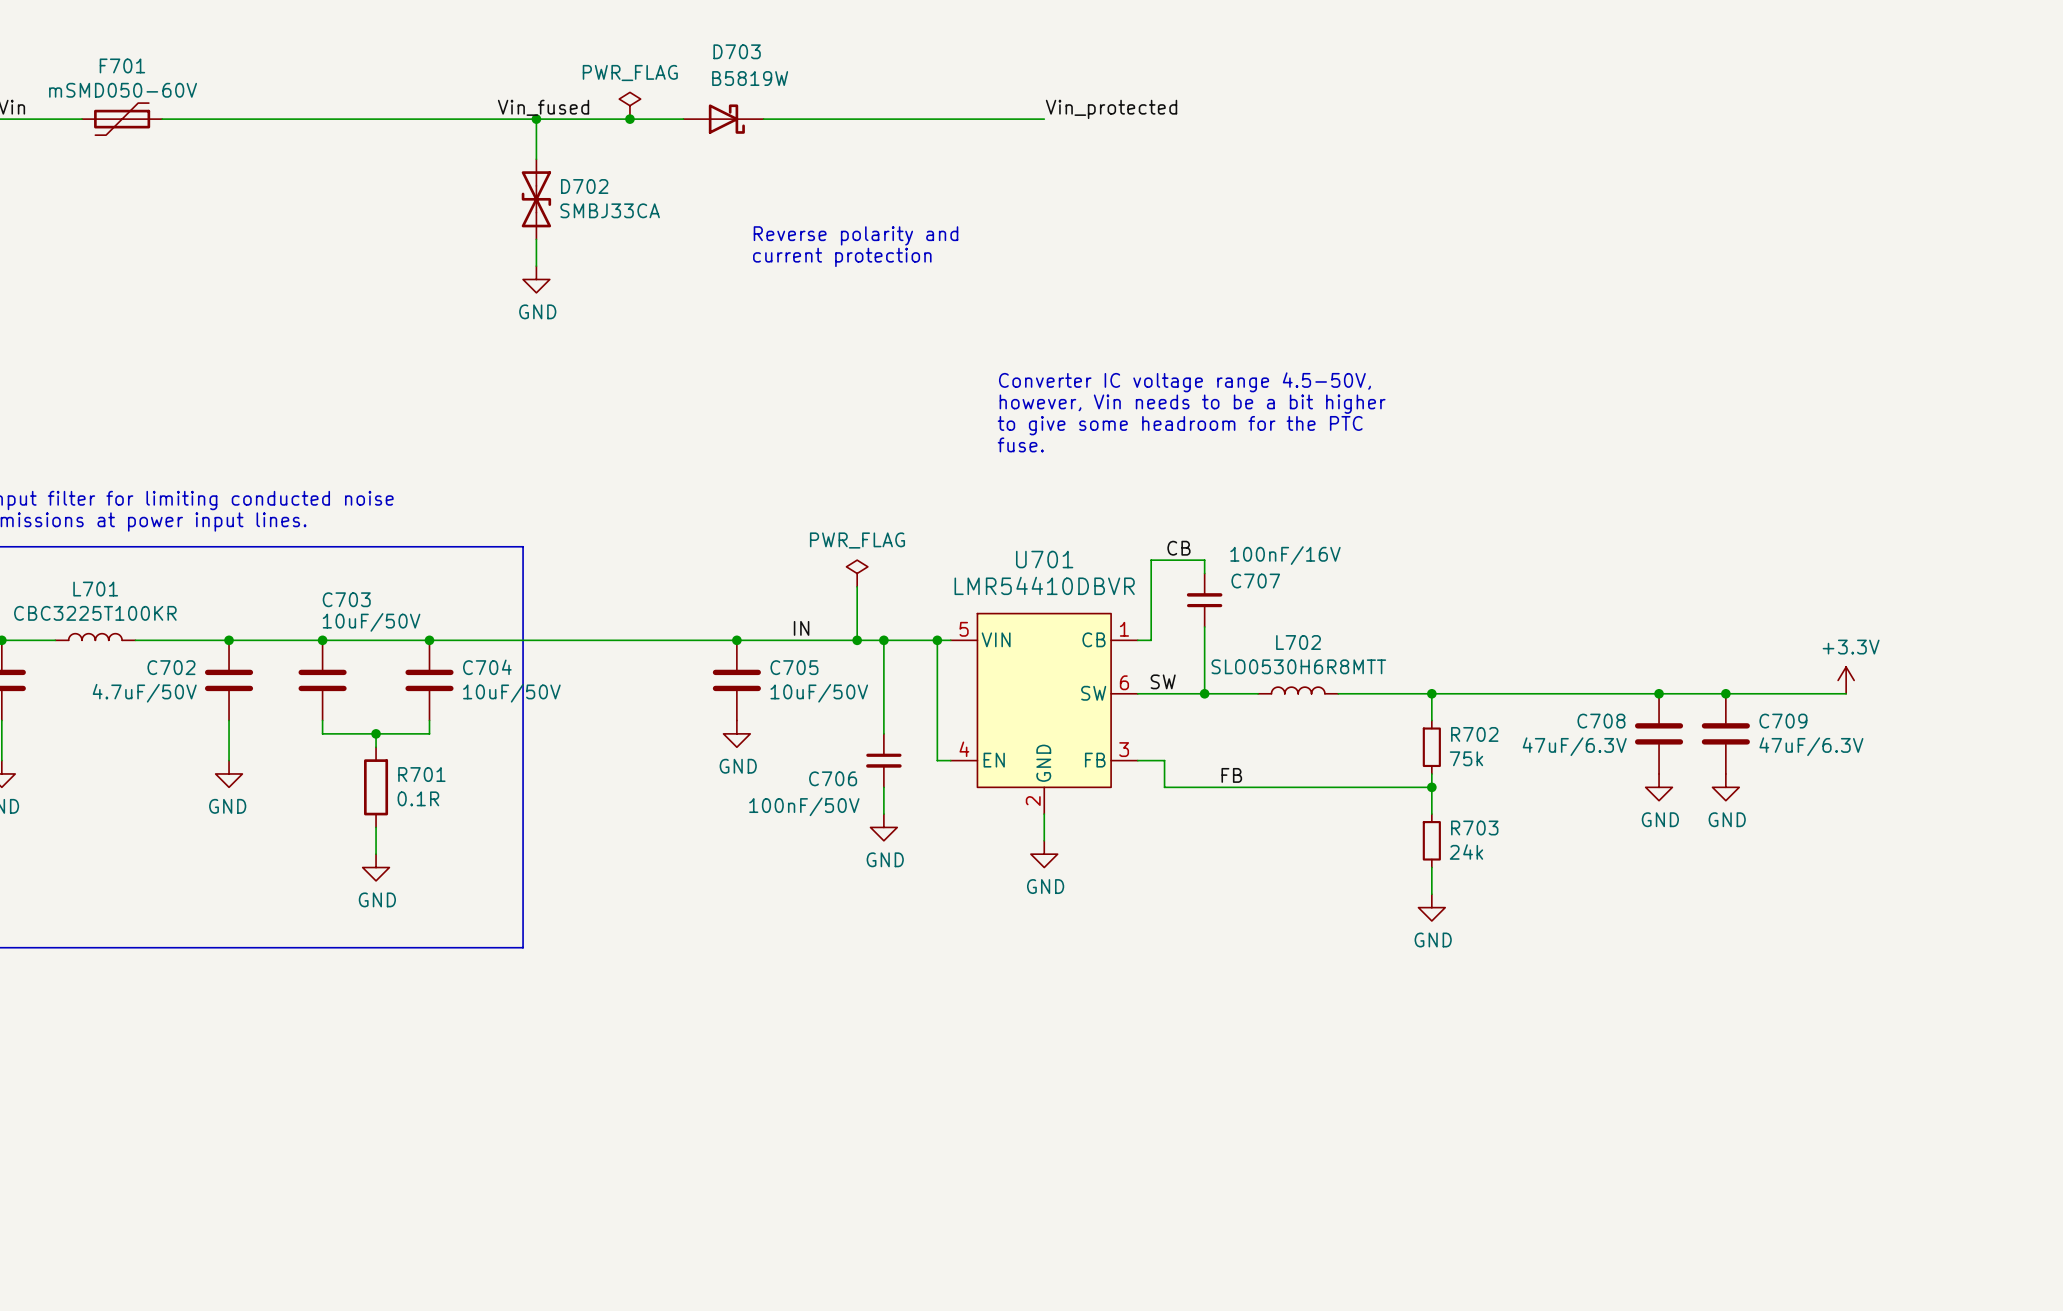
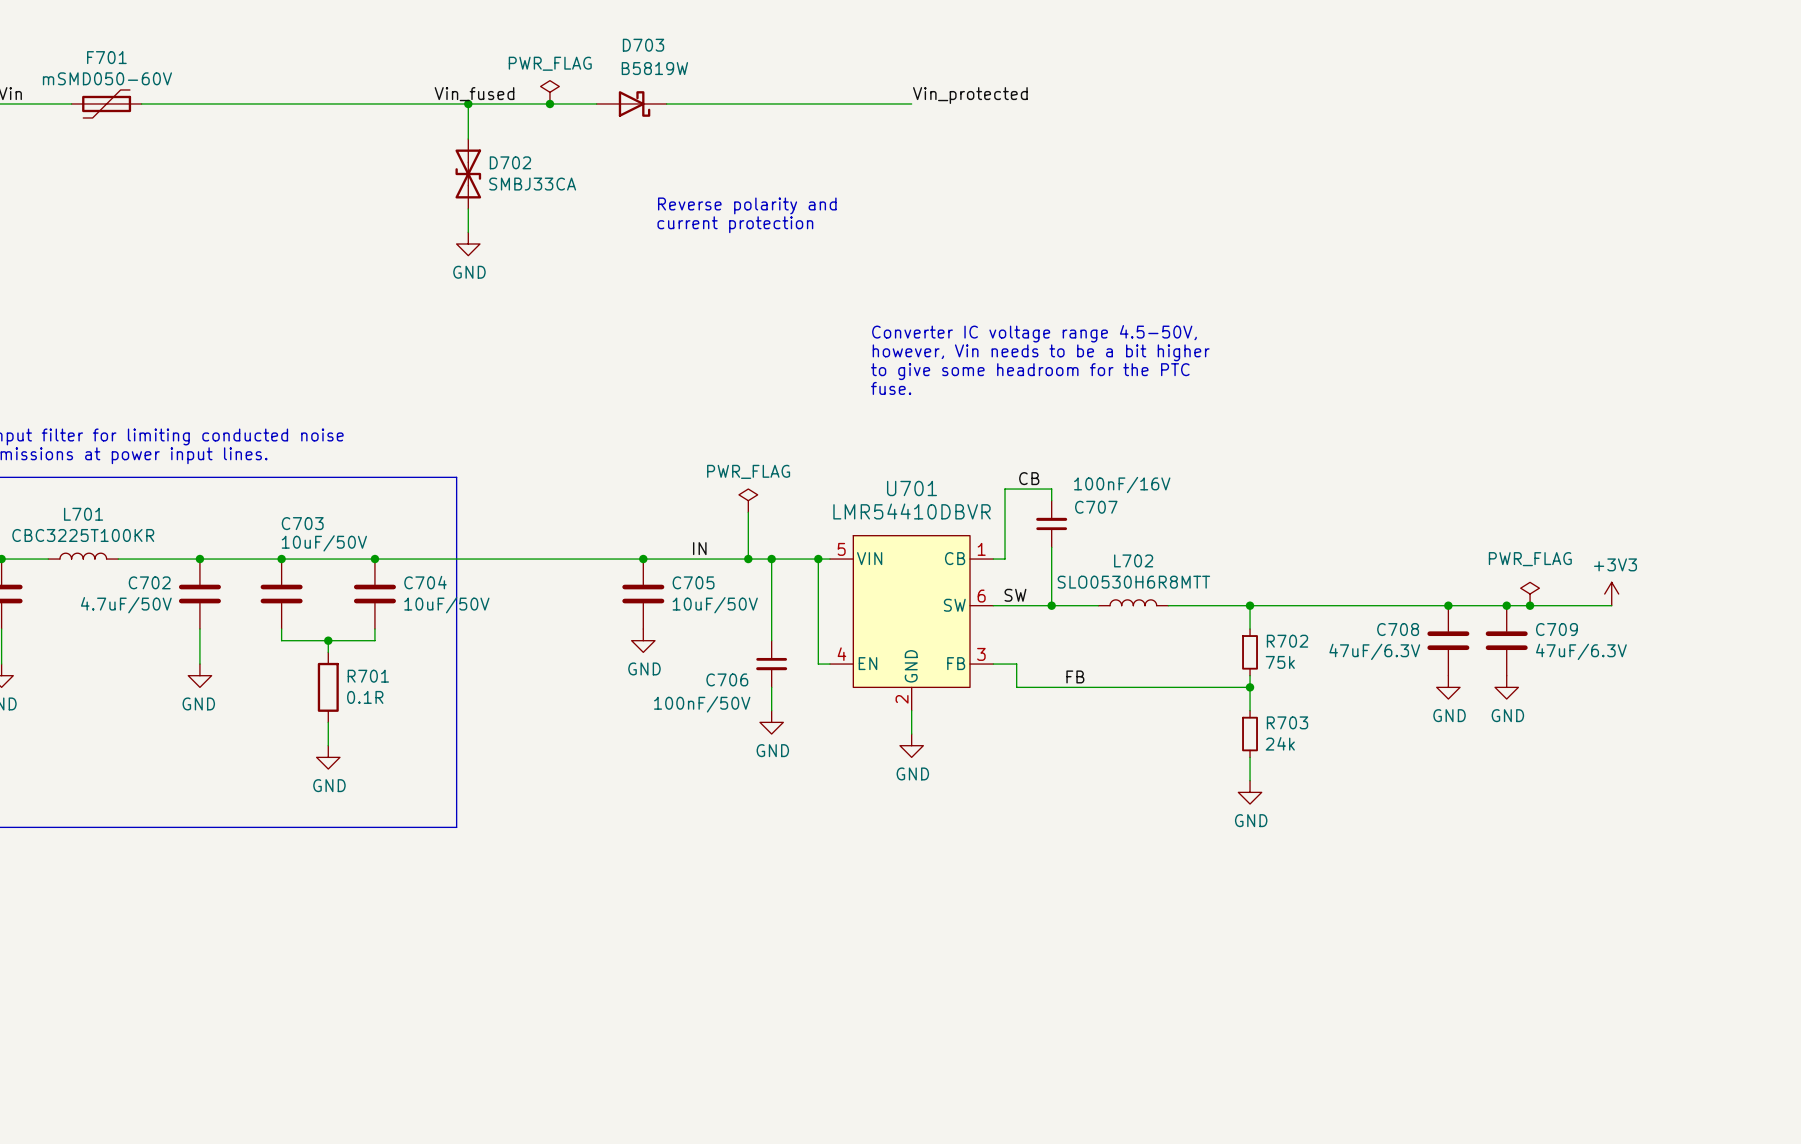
power symbol: none -> PWR_FLAG (1530, 594)
power symbol: +3.3V (1846, 680) -> +3V3 (1611, 594)
junction: none -> (1530, 605)

